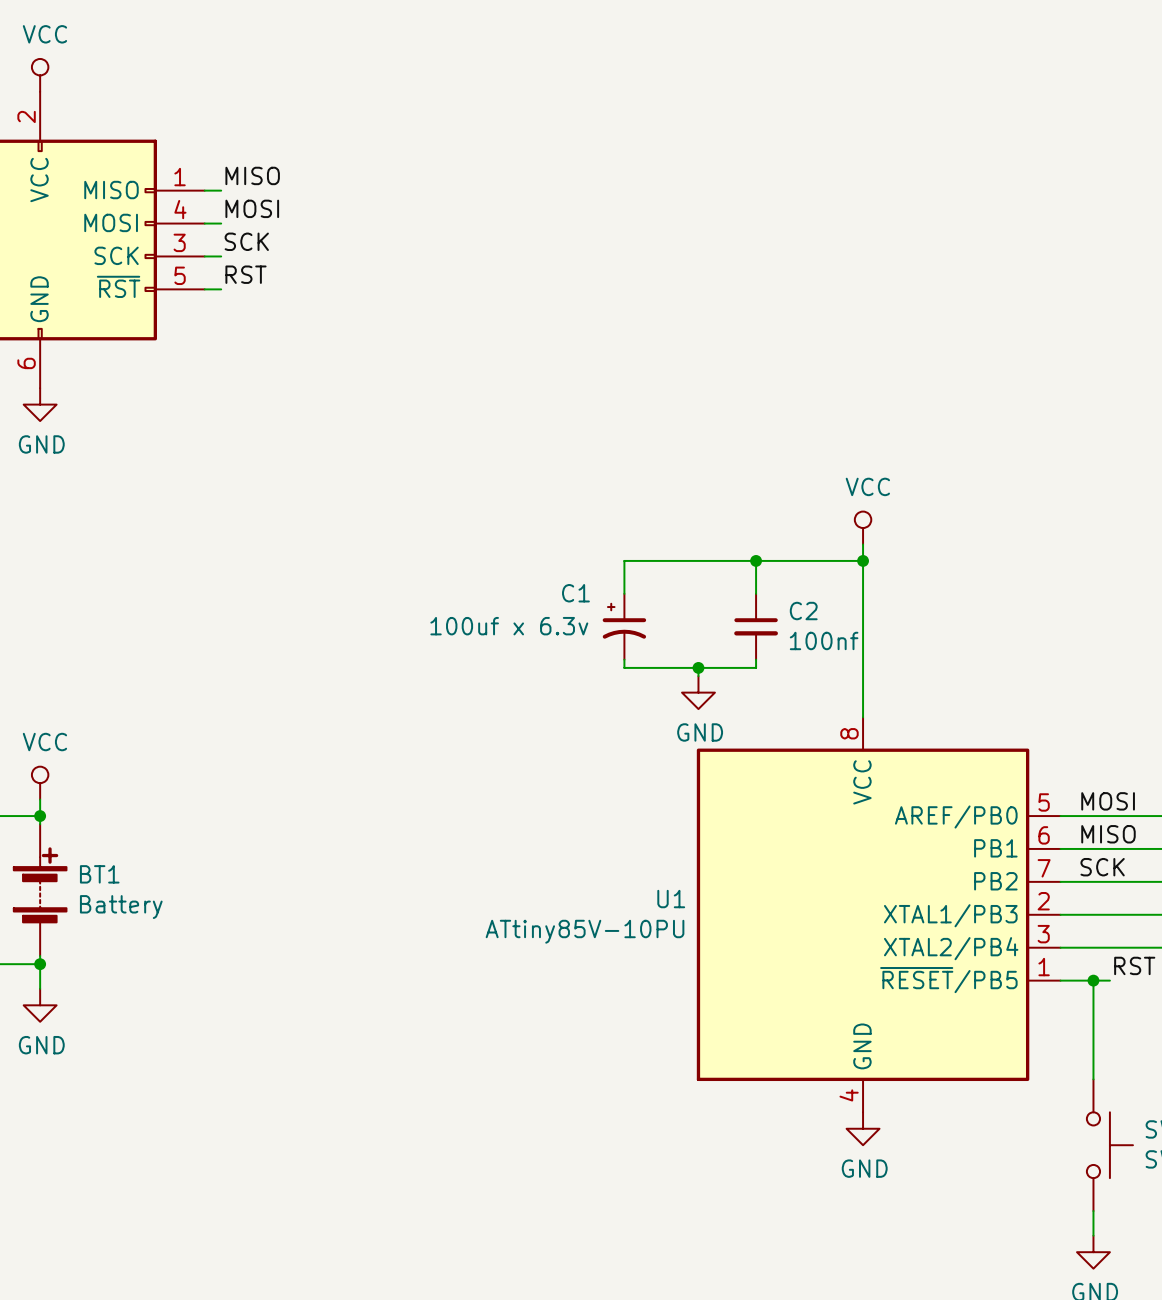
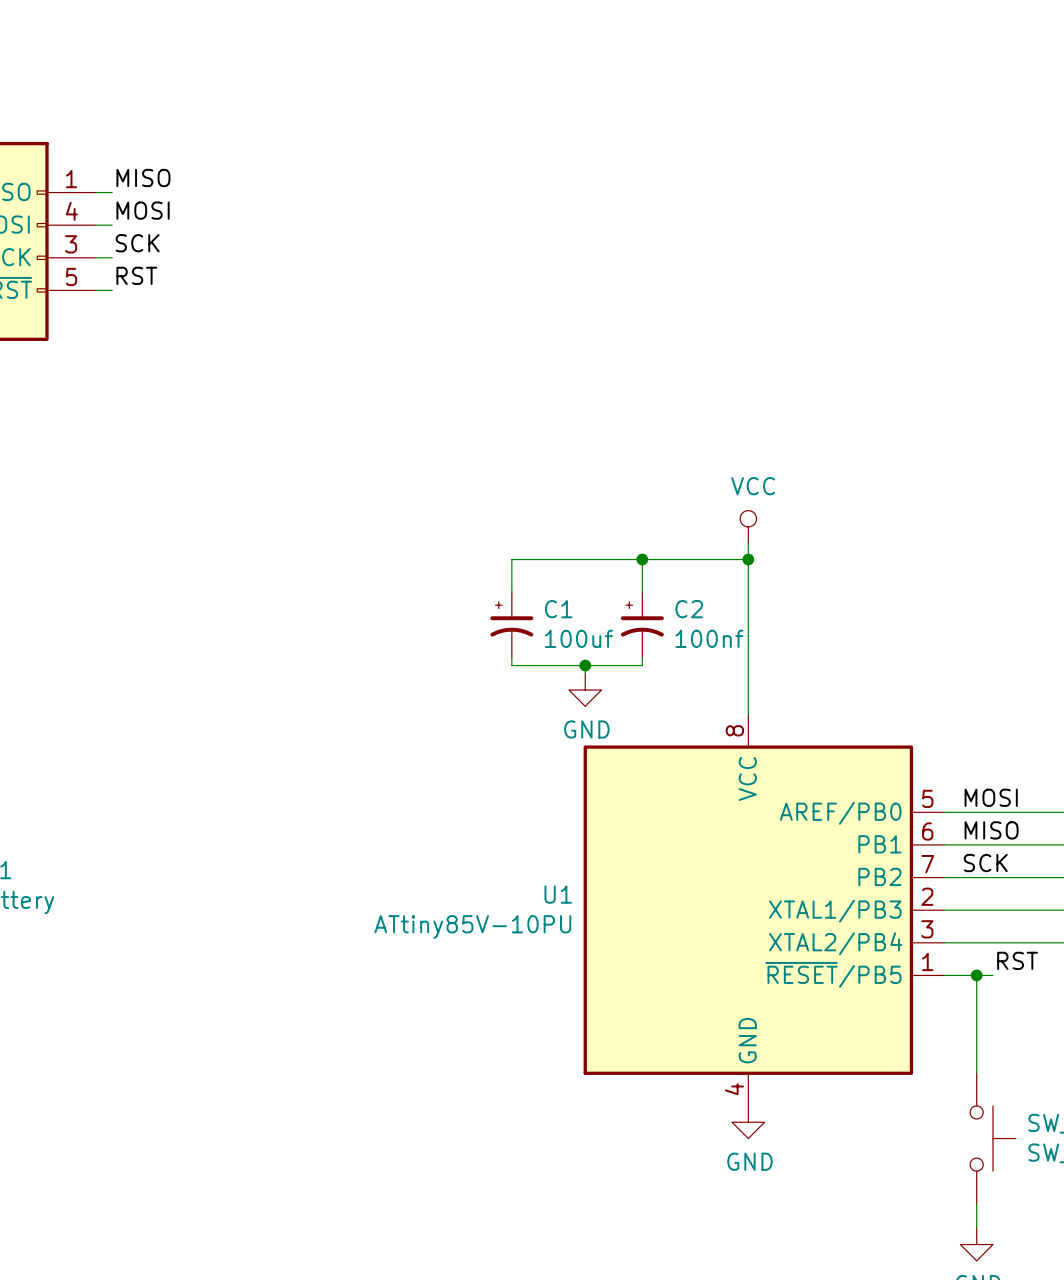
C1 name position: C1 (575, 593) -> C1 (558, 609)
C2 symbol: [734, 593, 778, 660] -> [620, 592, 664, 658]
C1 value: 100uf x 6.3v (509, 626) -> 100uf (578, 638)

